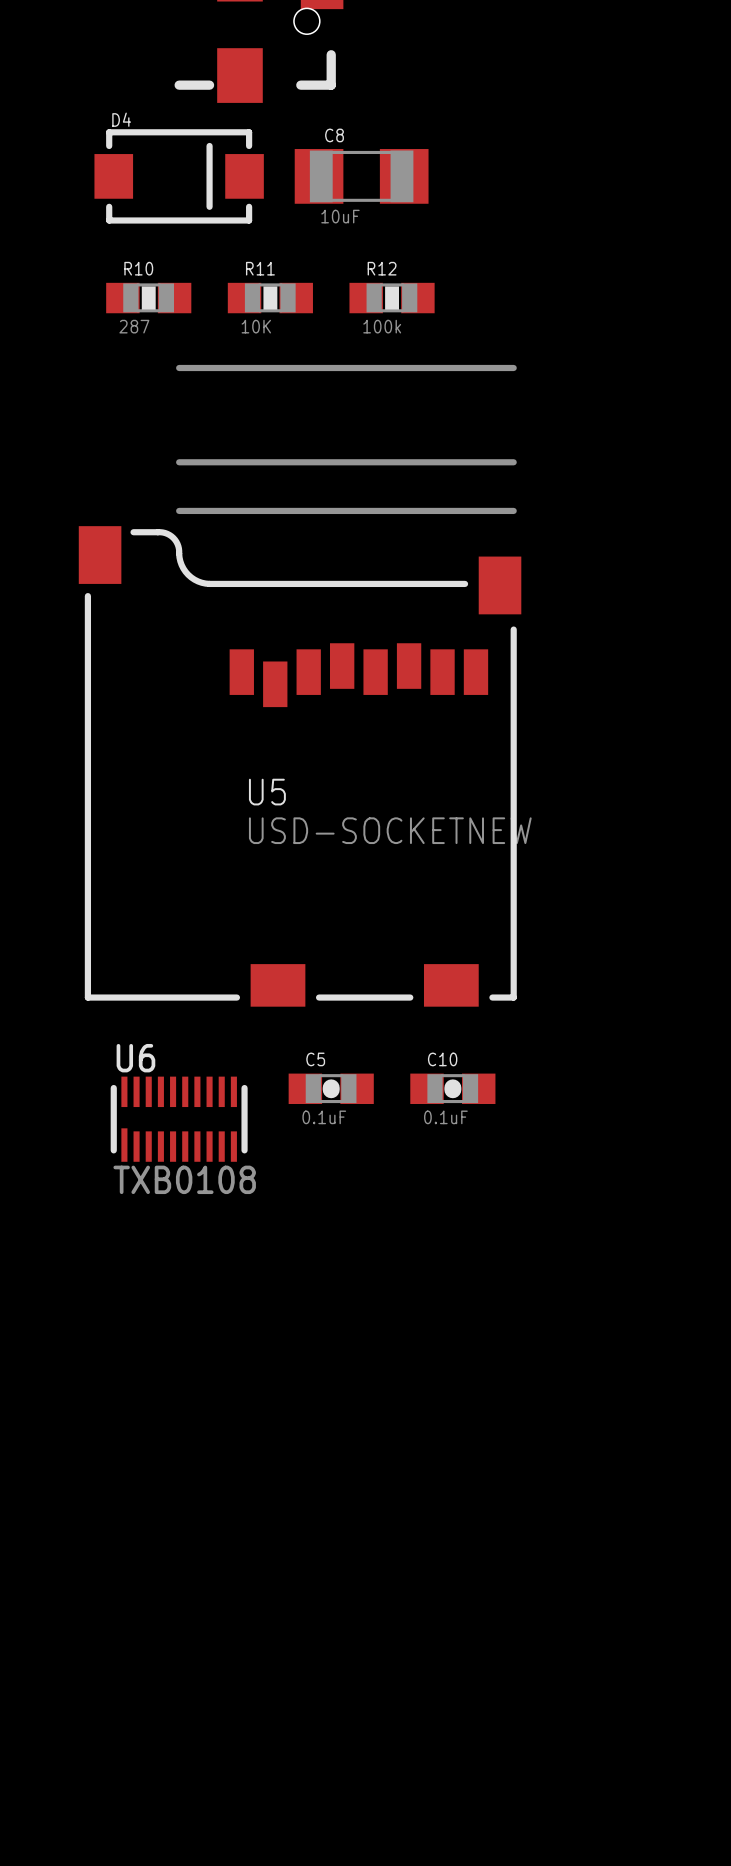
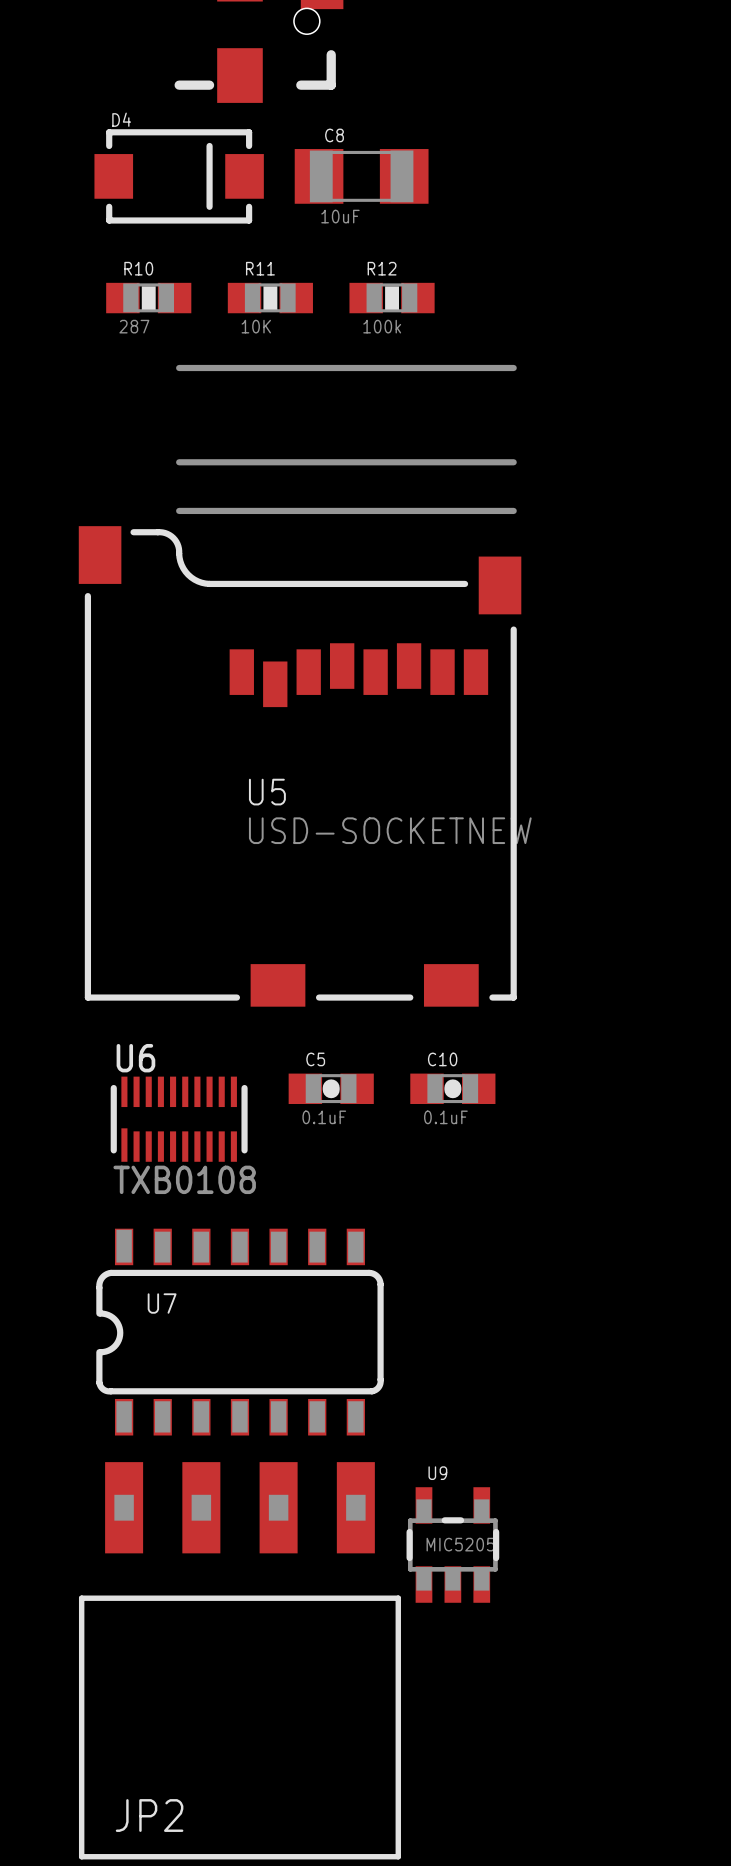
U7: none -> (239, 1332)
U9: none -> MIC5205 (452, 1544)
JP2: none -> (239, 1660)

